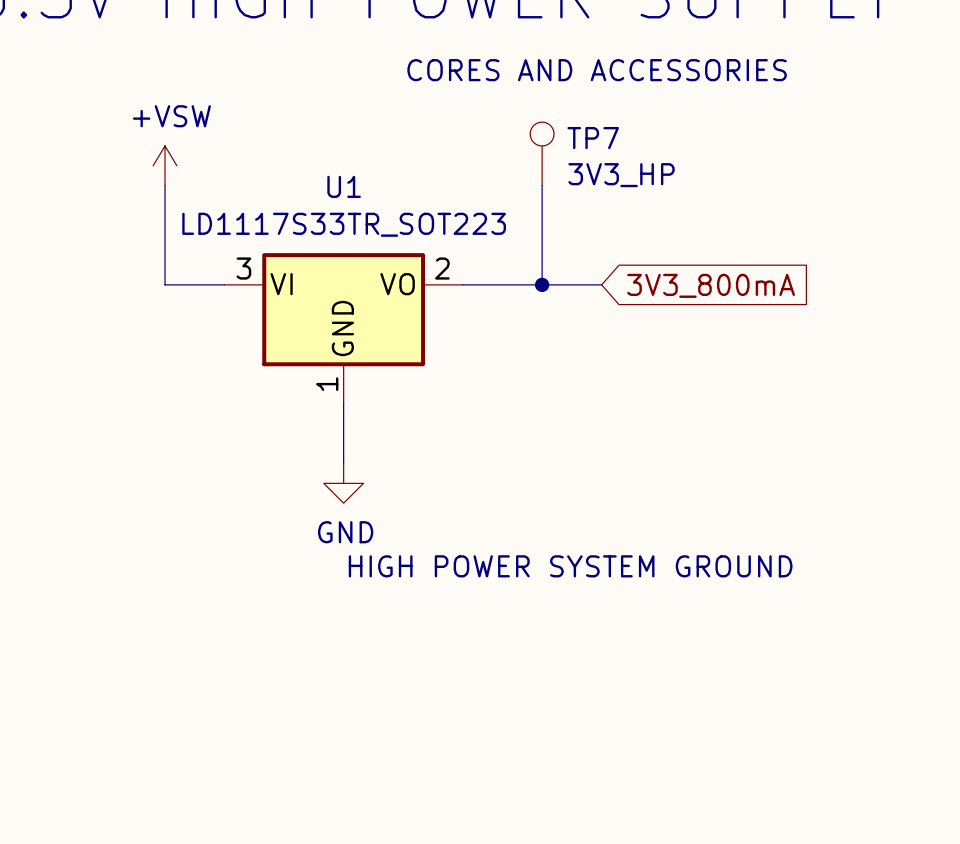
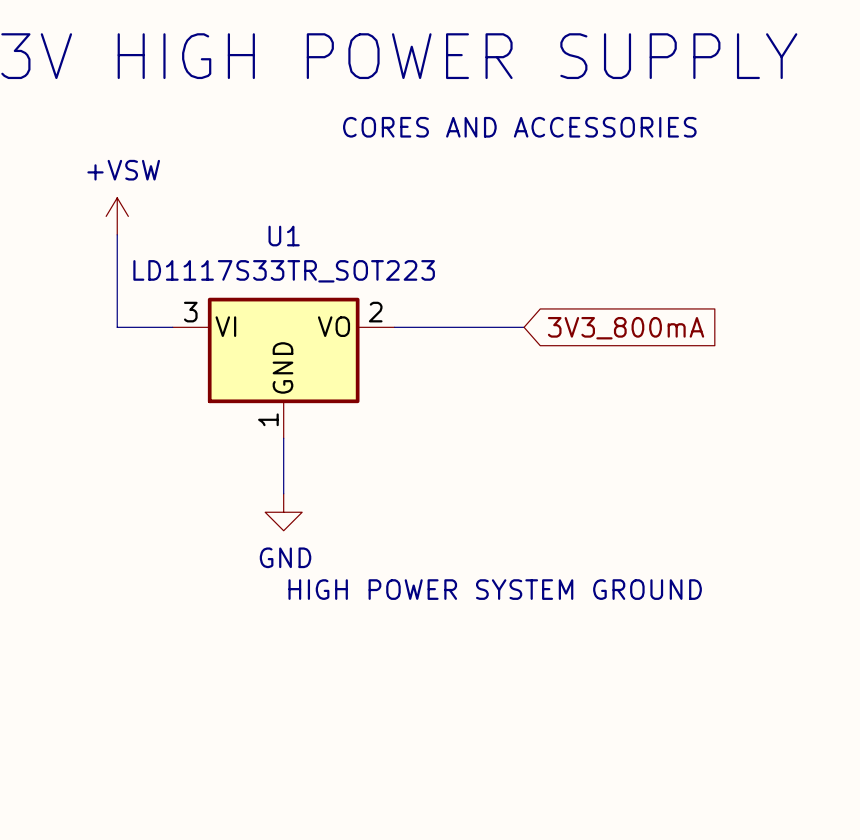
TP7: 3V3_HP (542, 153) -> none
wire: (542, 185) (542, 284) -> none
junction: (542, 284) -> none

